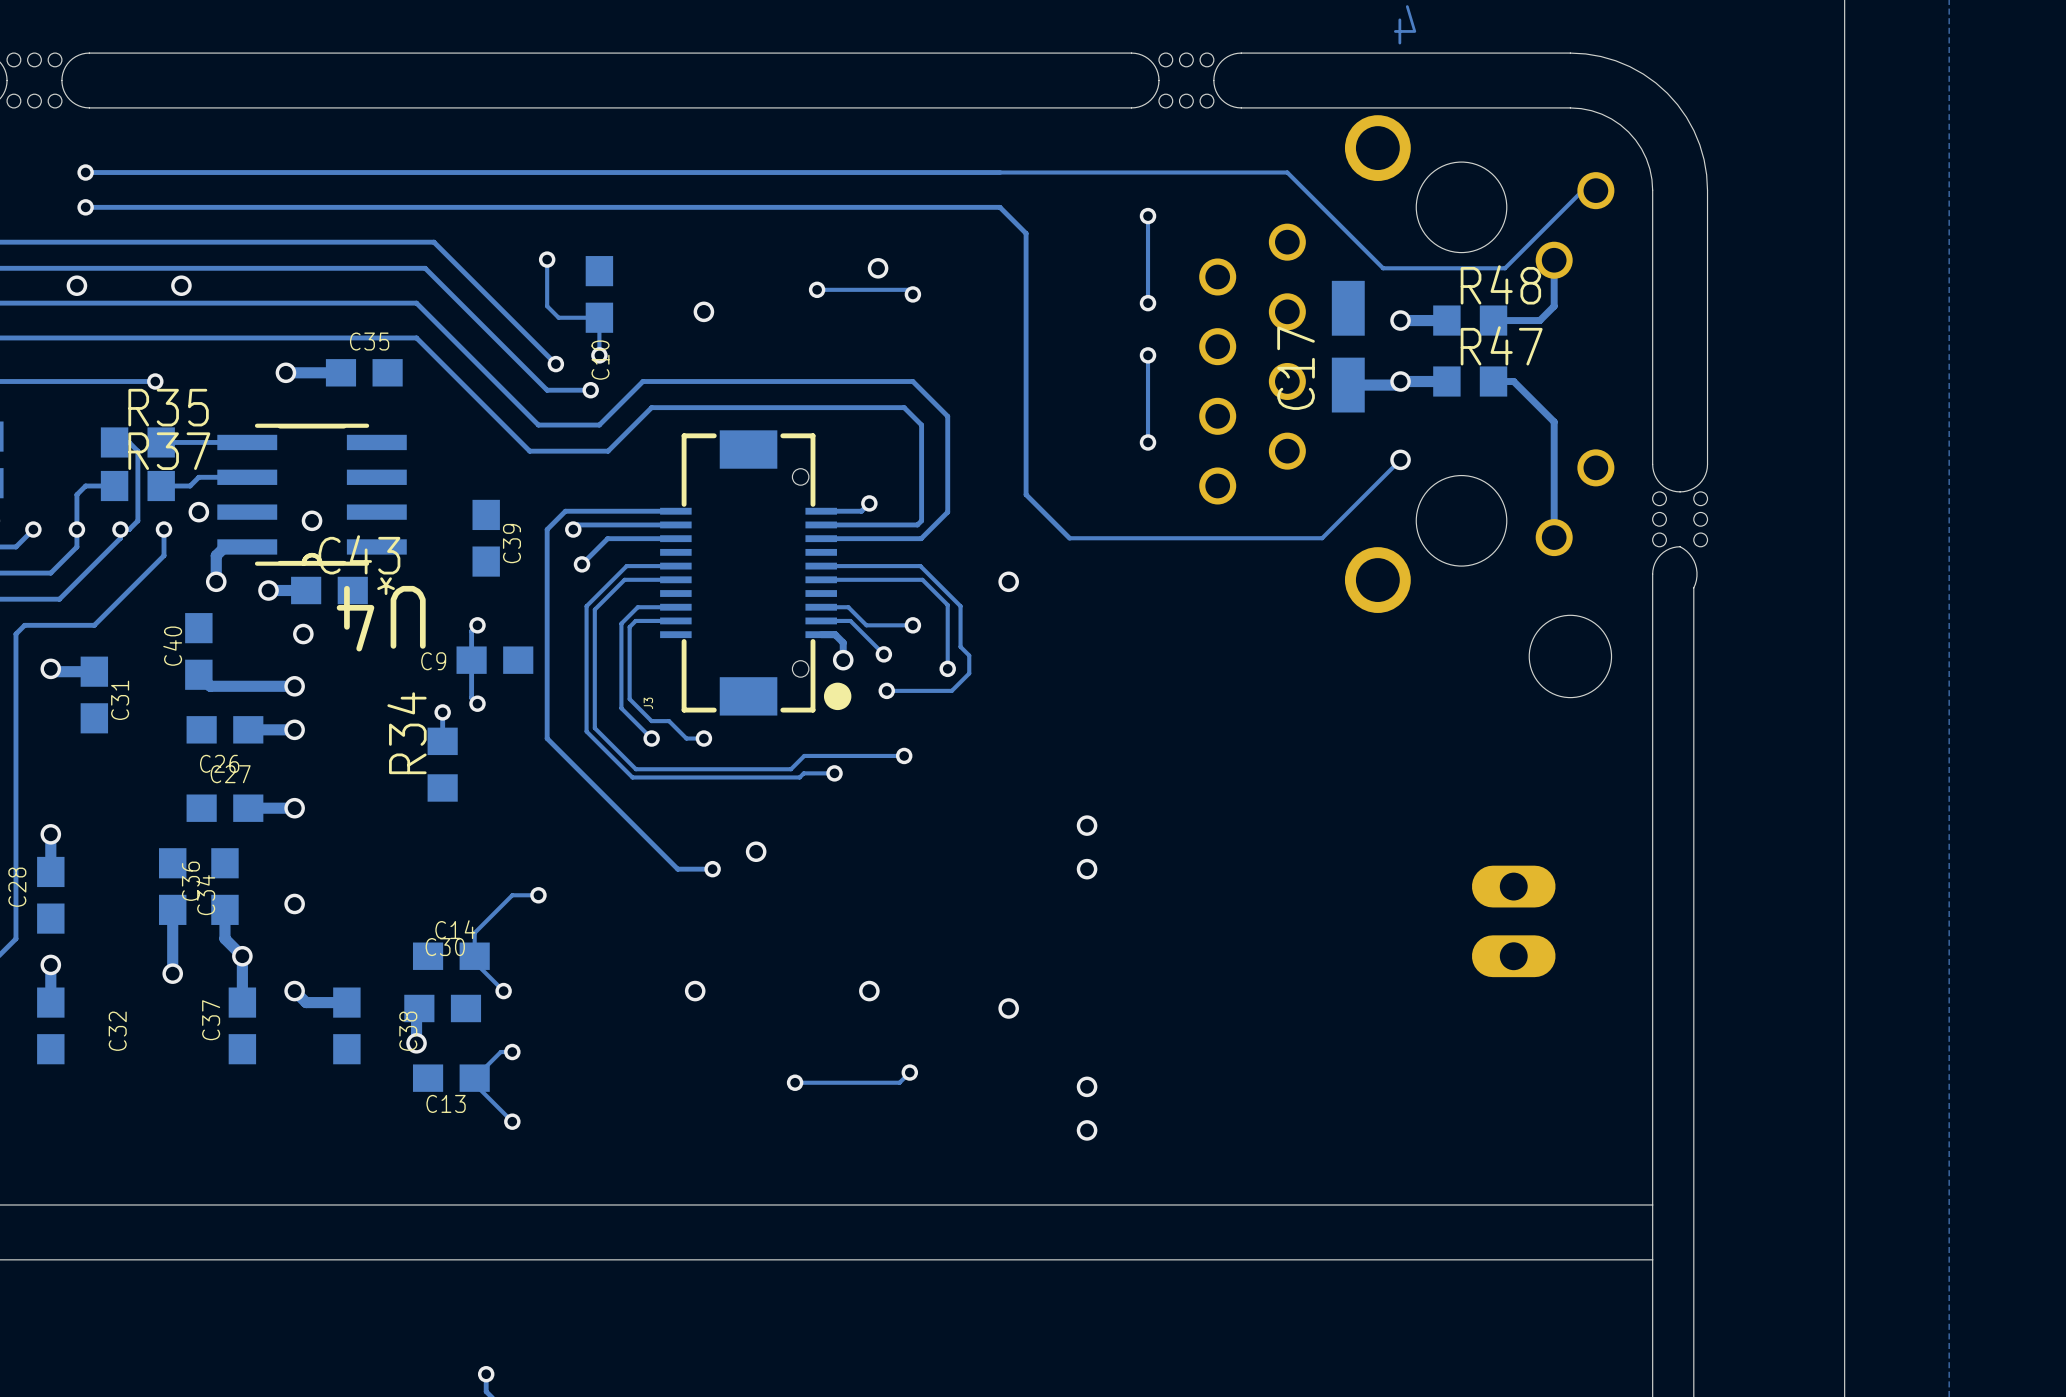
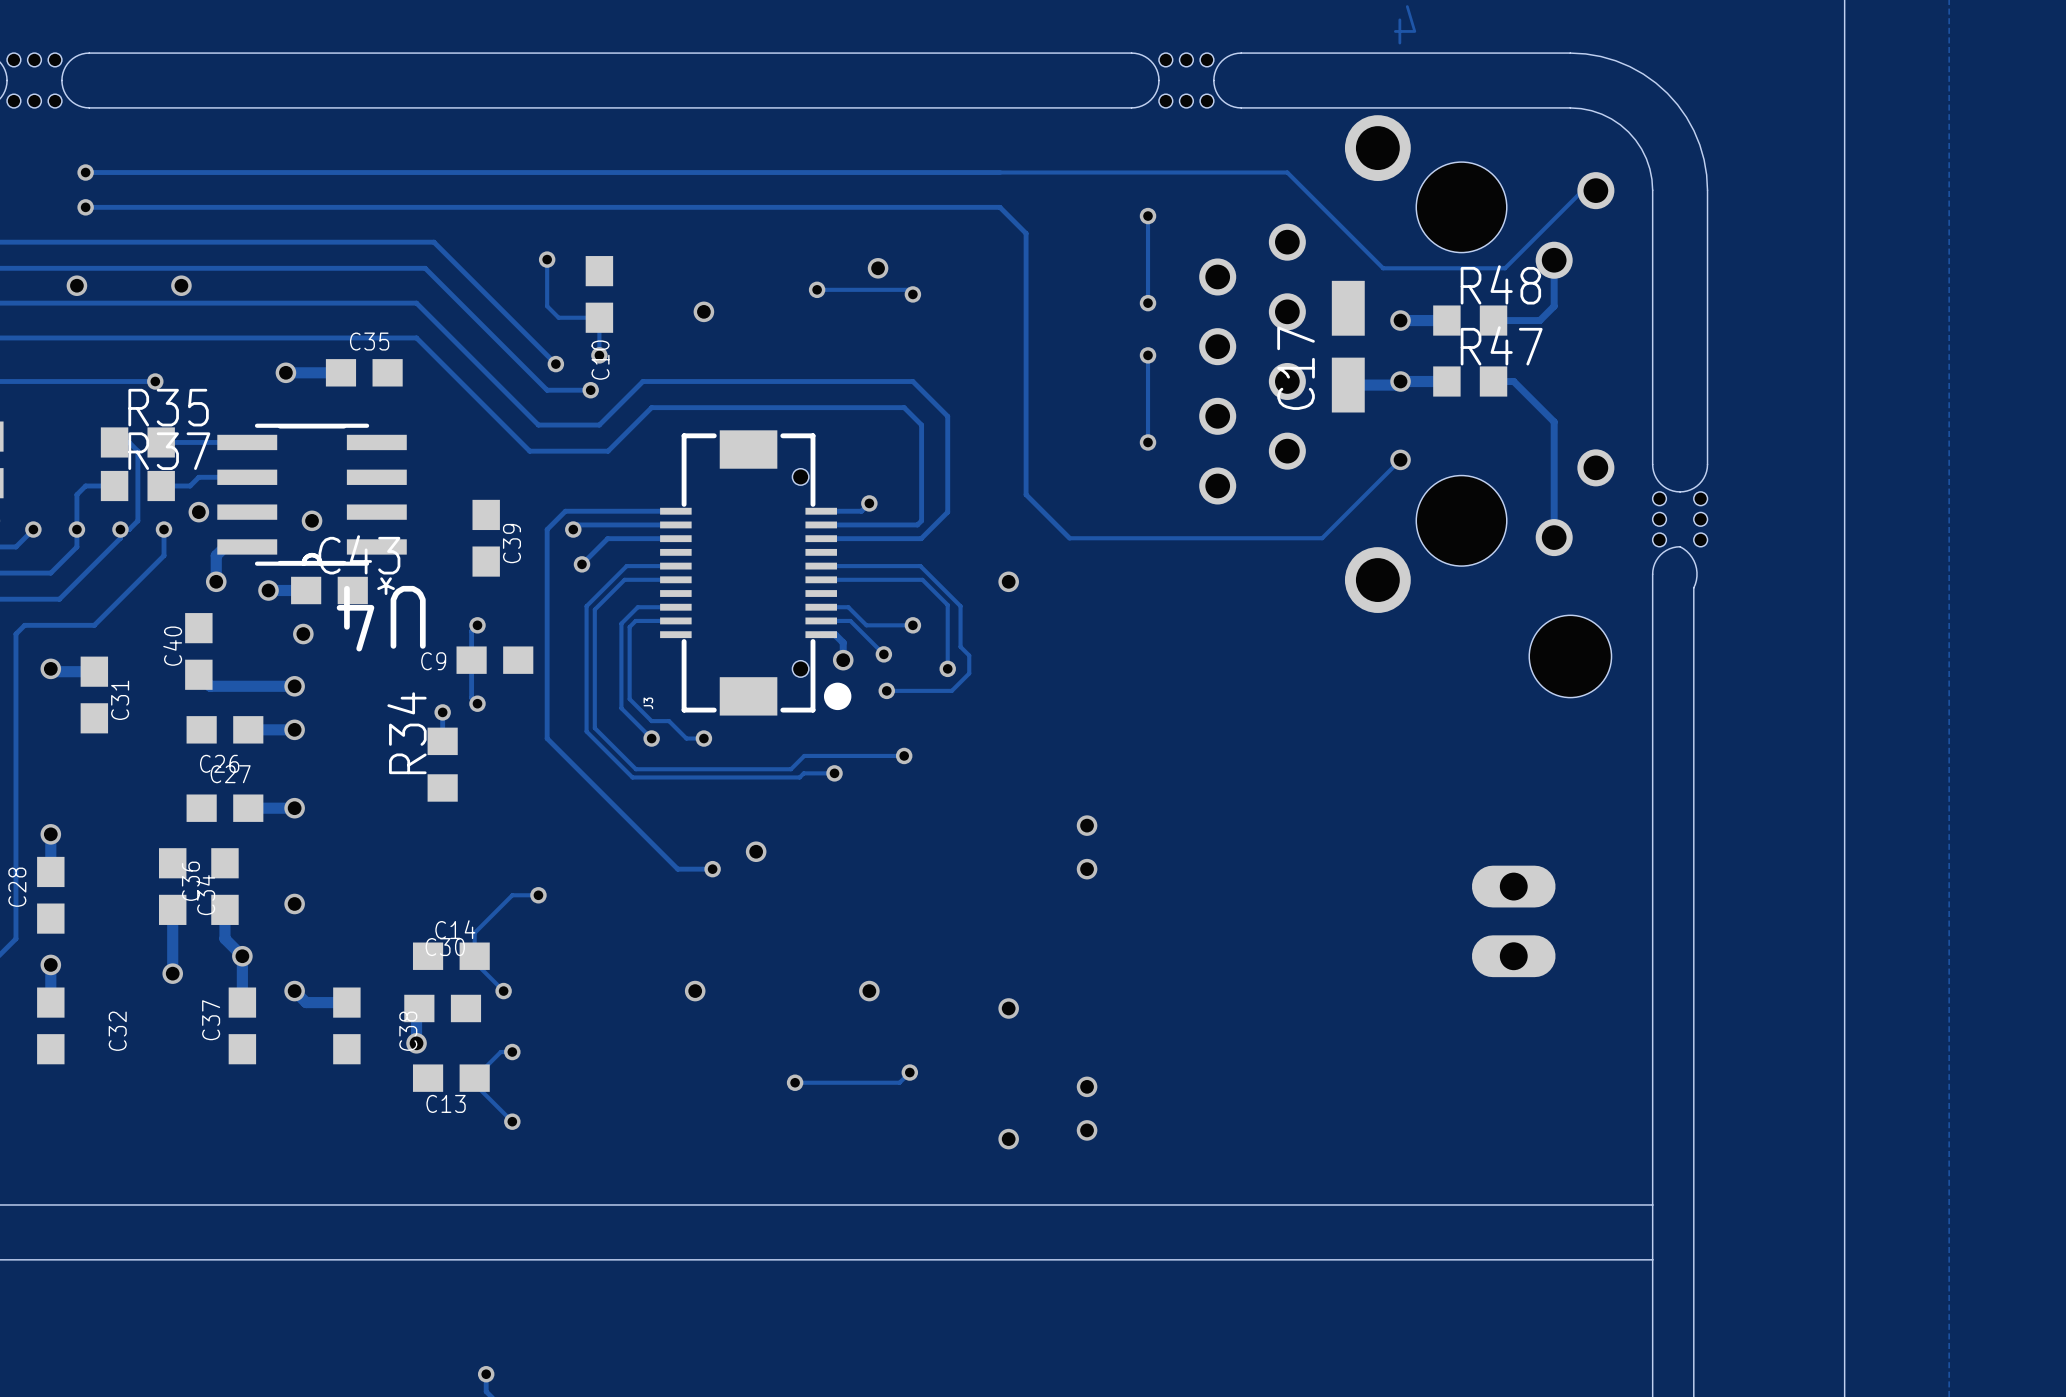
via: none -> (1008, 1139)

